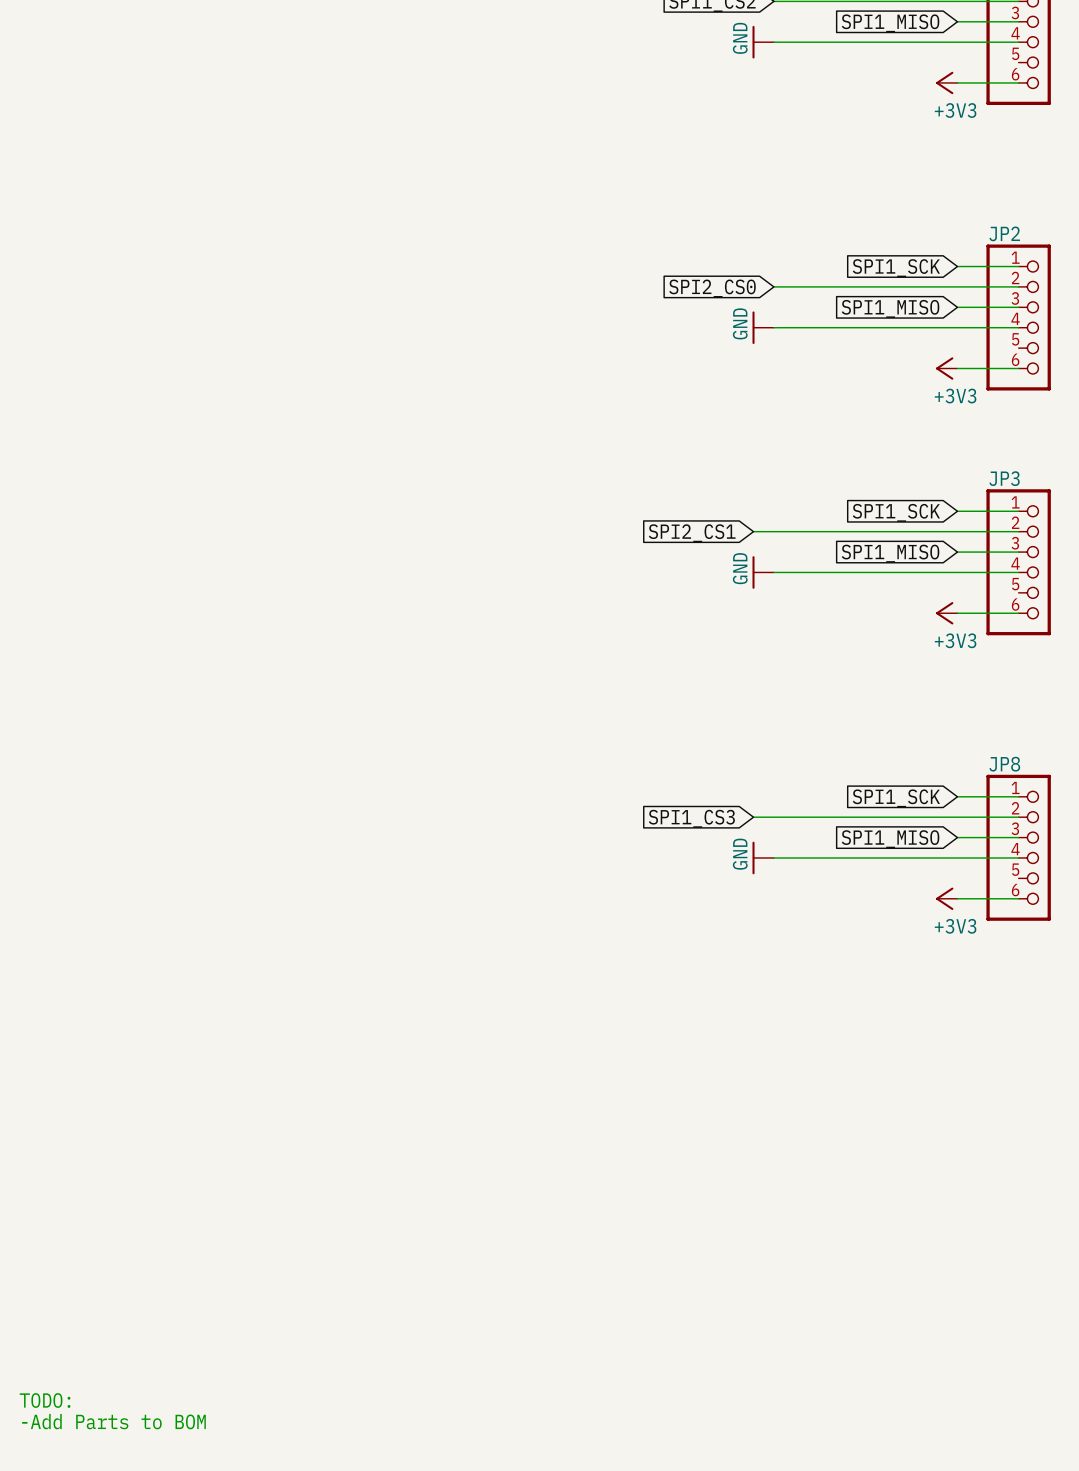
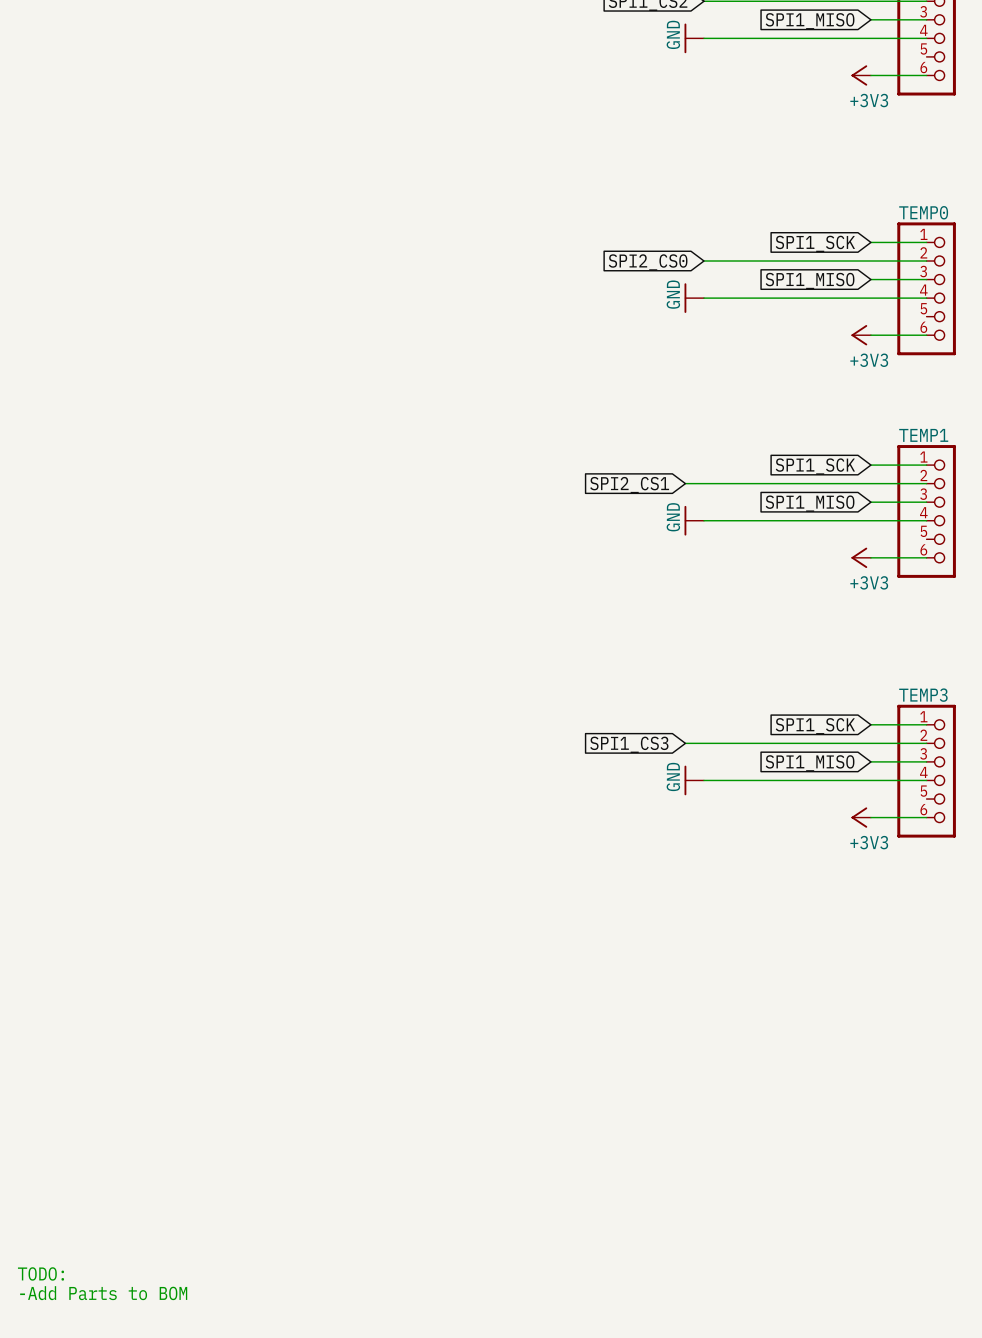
JP2 name: JP2 (1004, 233) -> TEMP0 (923, 212)
JP3 name: JP3 (1004, 478) -> TEMP1 (923, 435)
JP8 name: JP8 (1004, 764) -> TEMP3 (923, 695)

